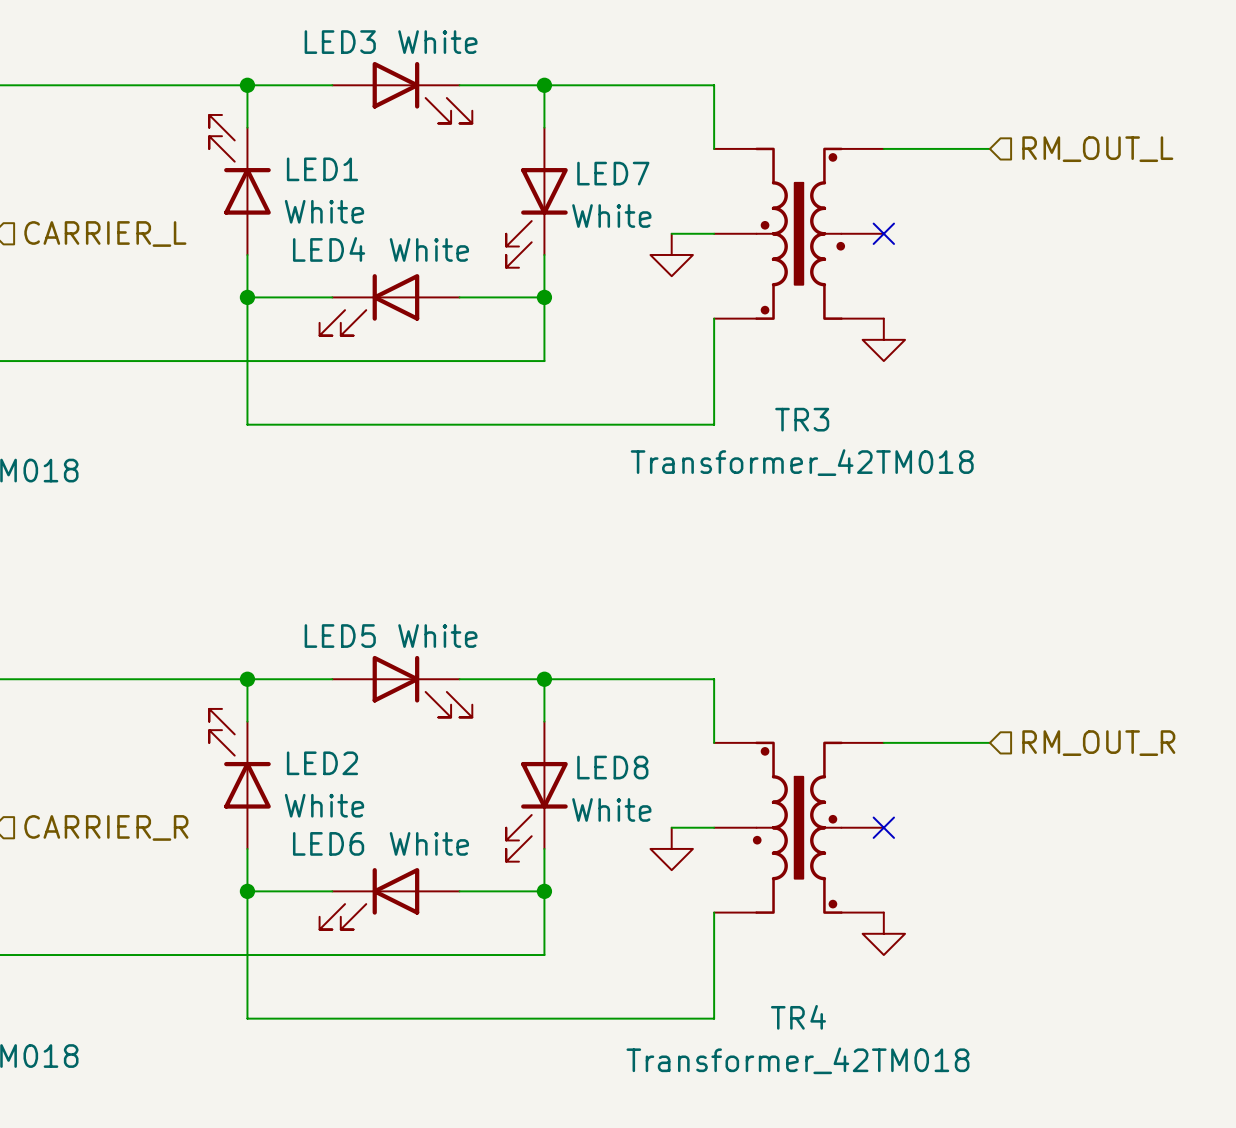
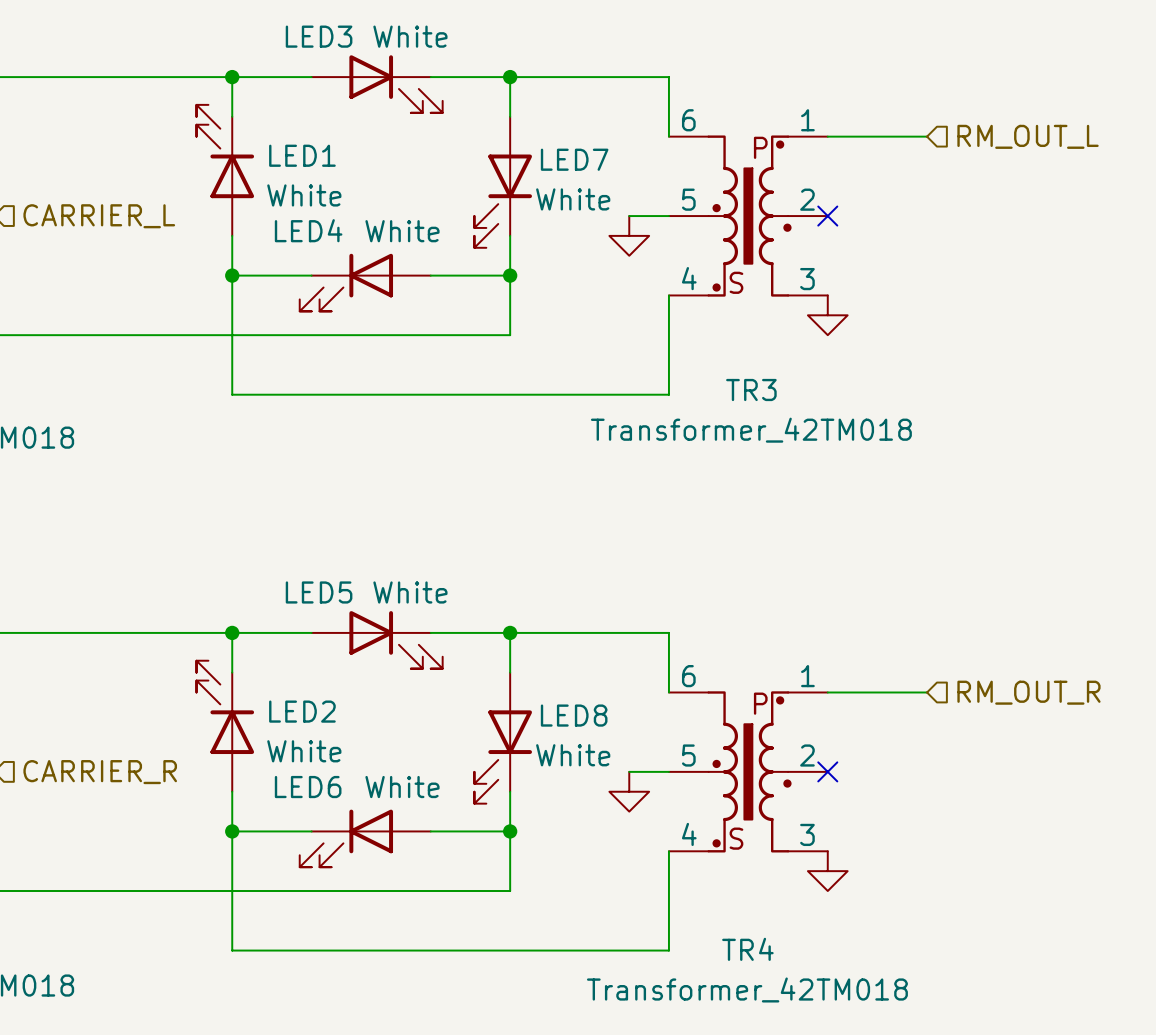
TR3 pin name: none -> 6 (688, 120)
TR3 pin name: none -> 1 (807, 120)
TR3 text: none -> P (760, 147)
TR3 pin name: none -> 5 (688, 199)
TR3 pin name: none -> 2 (807, 199)
TR3 pin name: none -> 4 (689, 278)
TR3 pin name: none -> 3 (807, 279)
TR3 text: none -> S (736, 282)
TR4 symbol: [714, 741, 884, 914] -> [668, 691, 828, 853]

